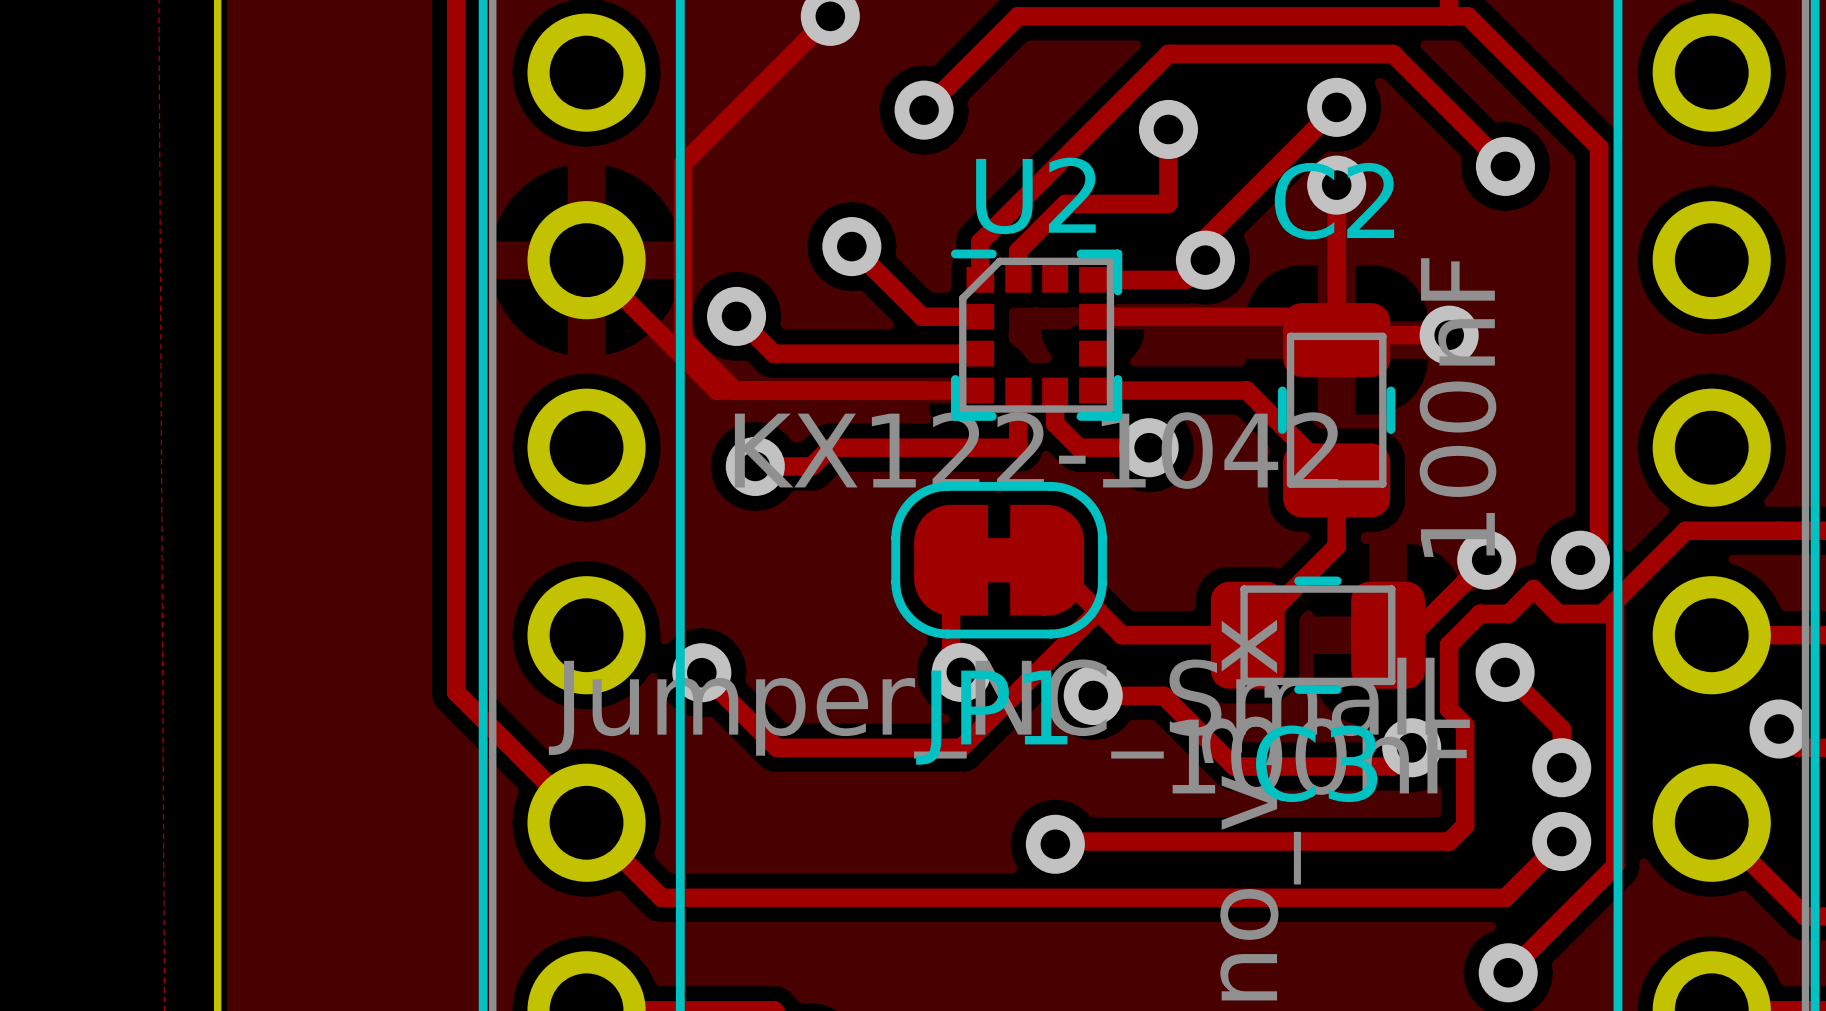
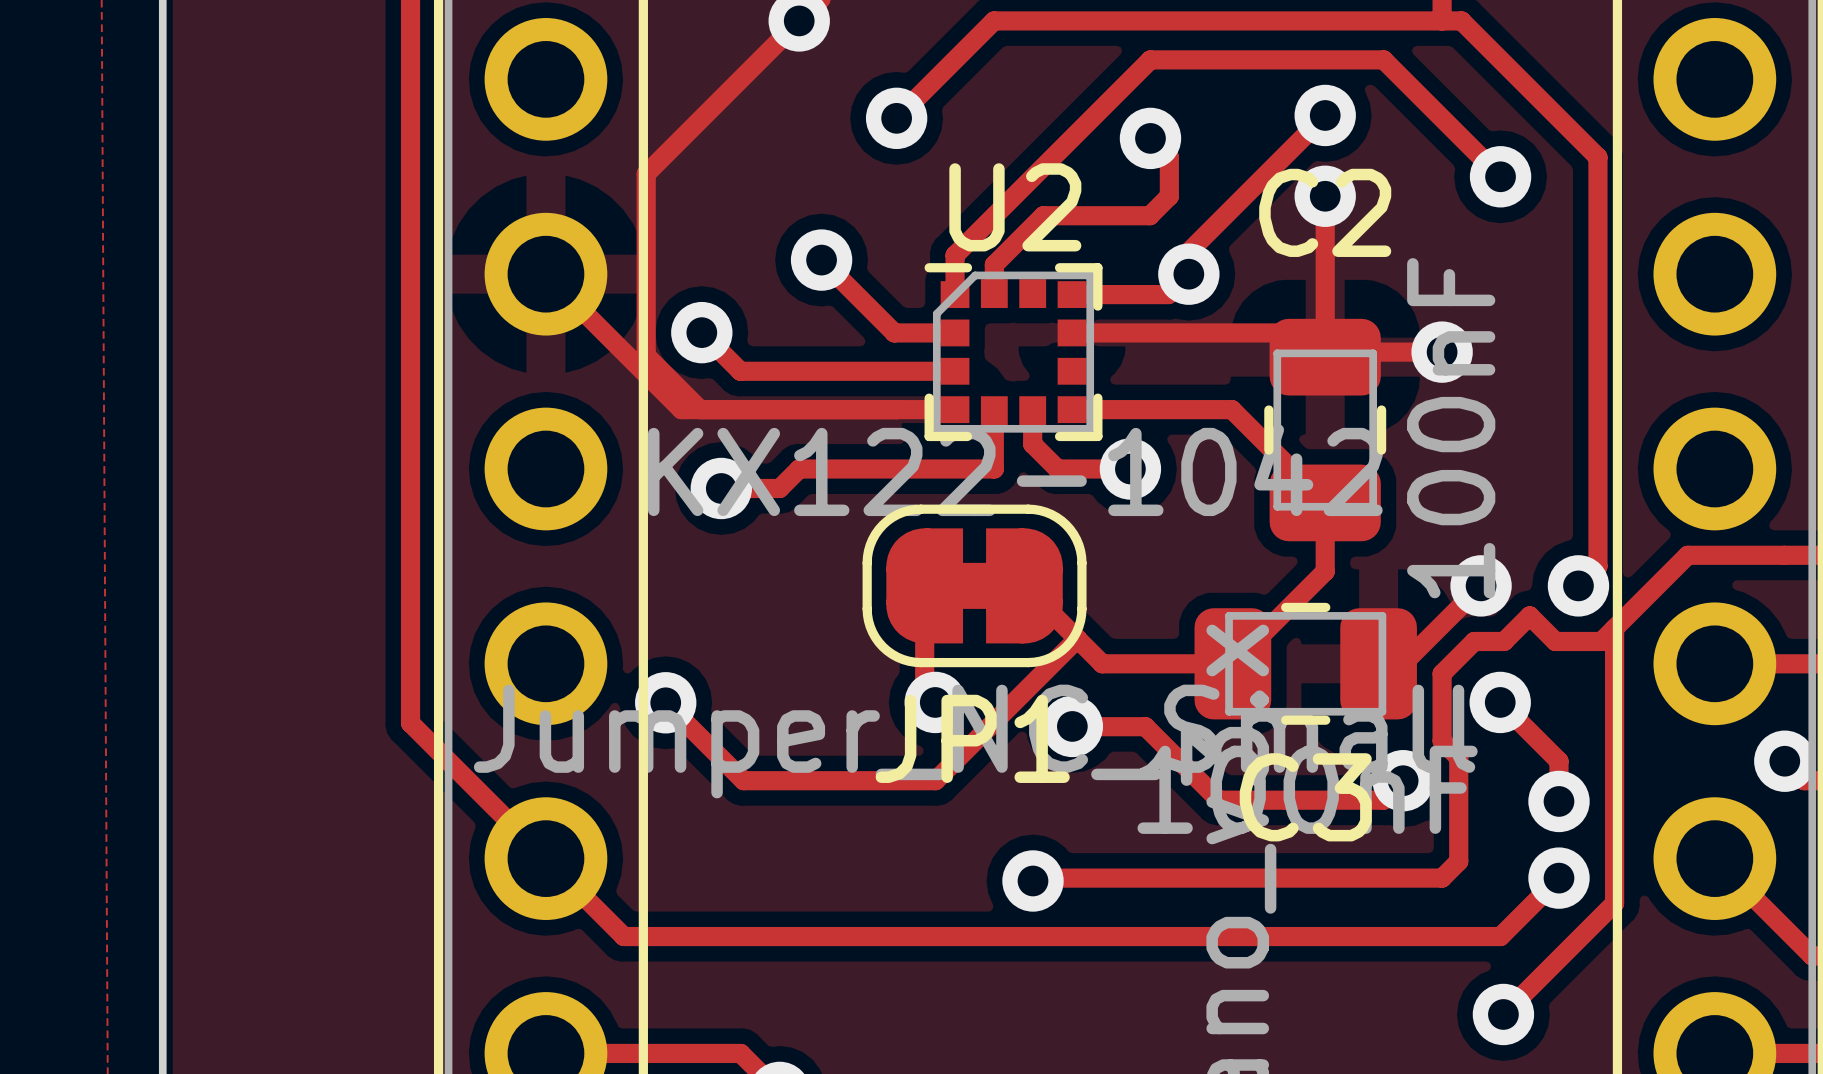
track: (1168, 129) (1168, 203) -> (1150, 138) (1169, 157) (1169, 196) (1150, 215)

